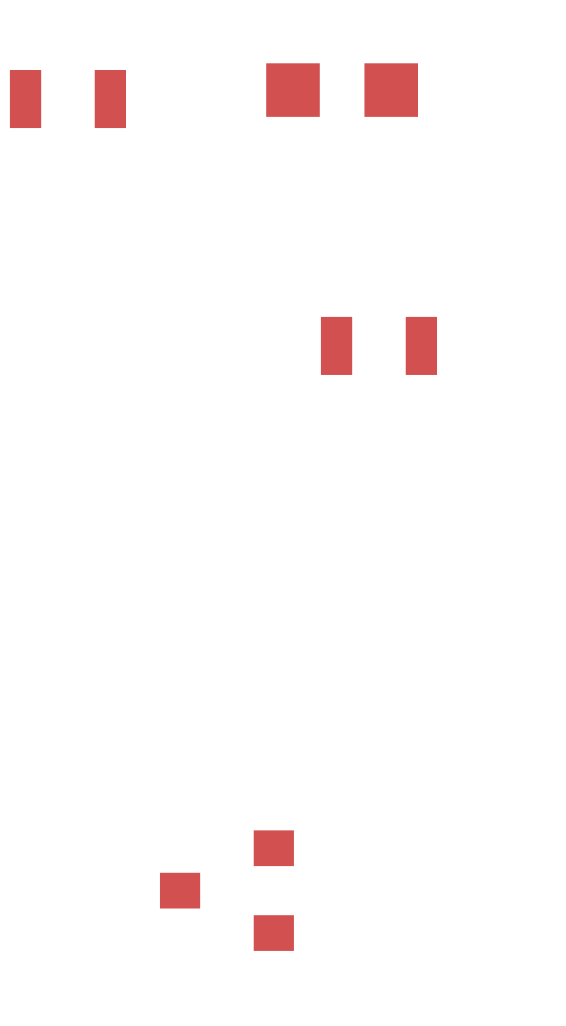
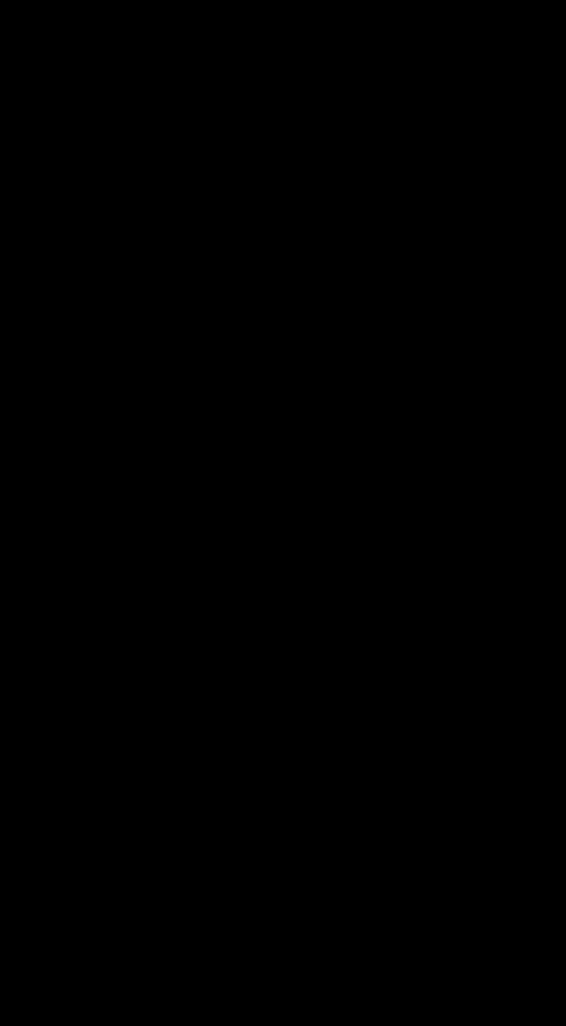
part: (342, 90) -> none
part: (67, 99) -> none
part: (378, 345) -> none
part: (226, 890) -> none

